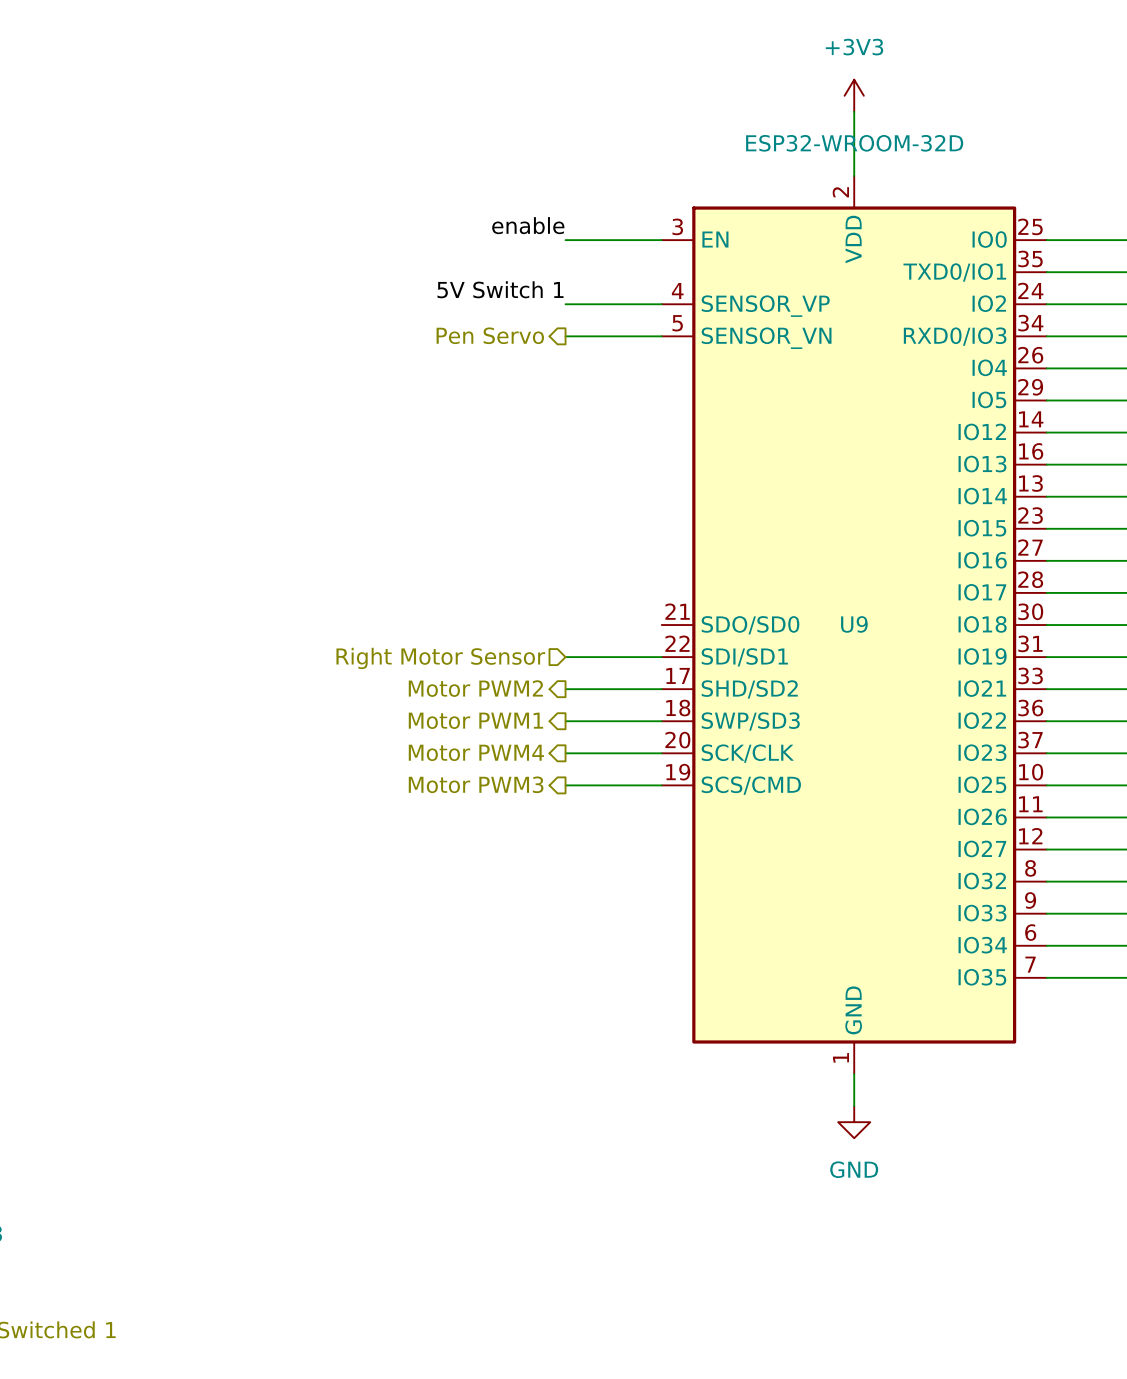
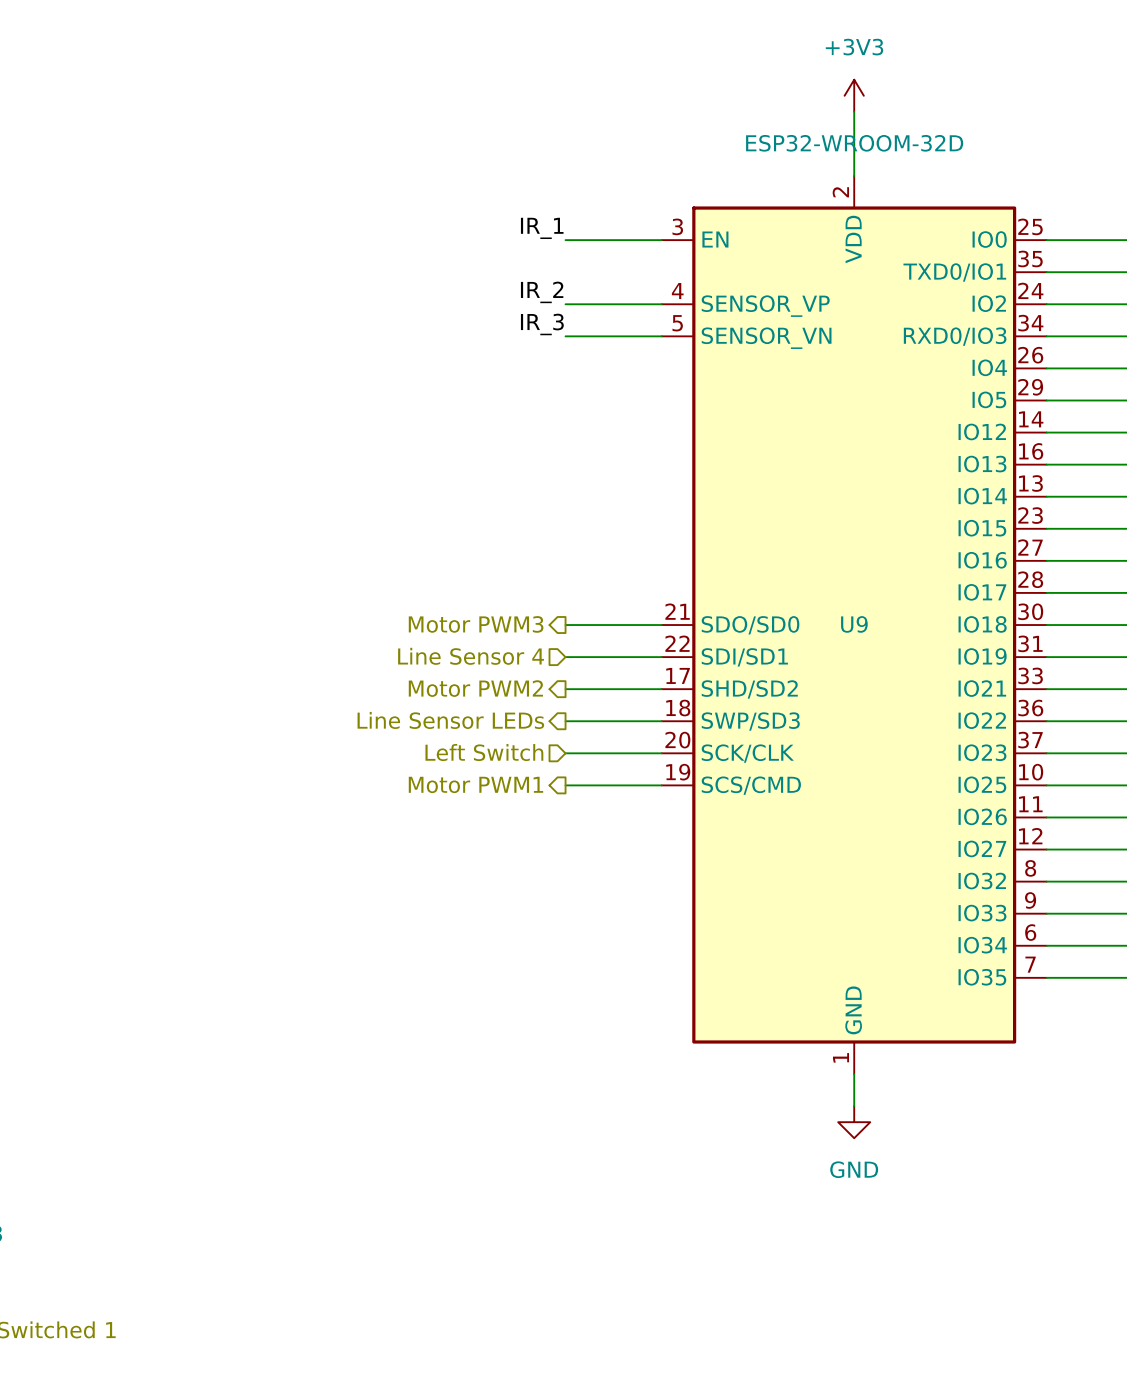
label: enable (528, 225) -> IR_1 (542, 228)
label: 5V Switch 1 (500, 289) -> IR_2 (542, 292)
label: none -> IR_3 (542, 324)
hierarchical label: Pen Servo (490, 335) -> none
hierarchical label: none -> Motor PWM3 (476, 624)
wire: none -> (565, 625) (661, 625)
hierarchical label: Right Motor Sensor (440, 658) -> Line Sensor 4 (471, 656)
hierarchical label: Motor PWM1 (475, 720) -> Line Sensor LEDs (450, 720)
hierarchical label shape: output (476, 752) -> input (484, 752)
hierarchical label: Motor PWM4 (476, 752) -> Left Switch (484, 752)
hierarchical label: Motor PWM3 (476, 784) -> Motor PWM1 (475, 784)

